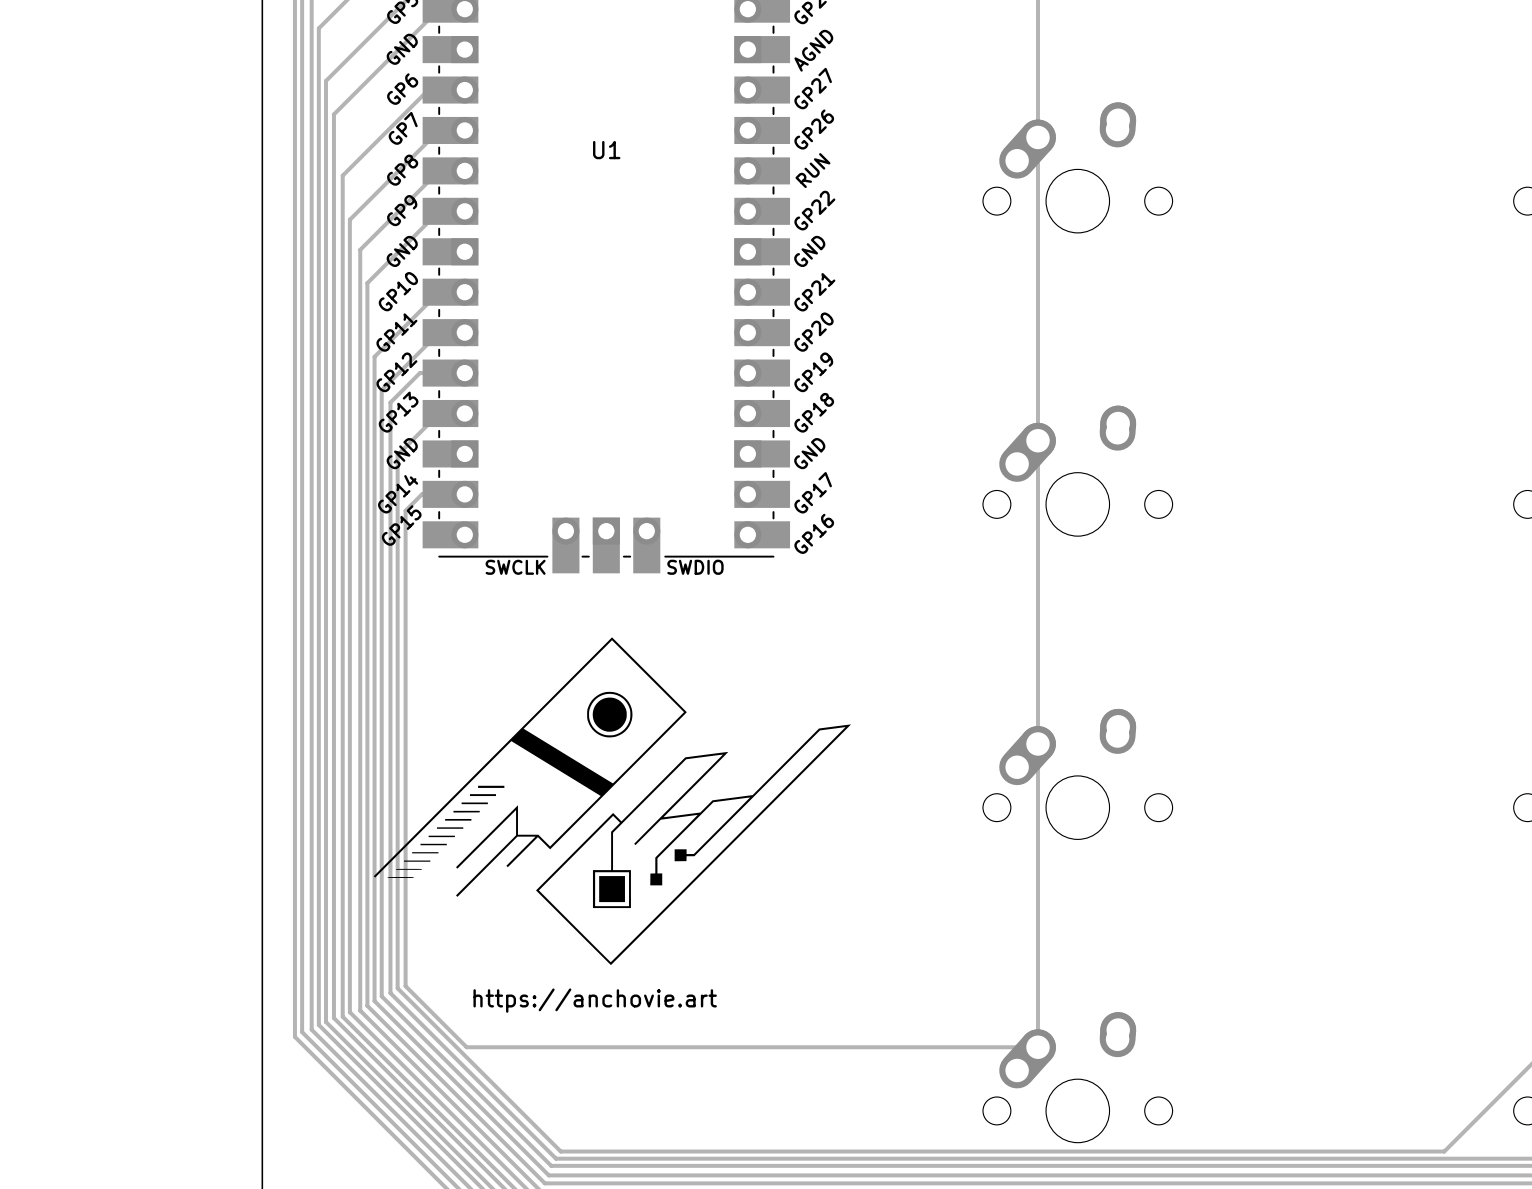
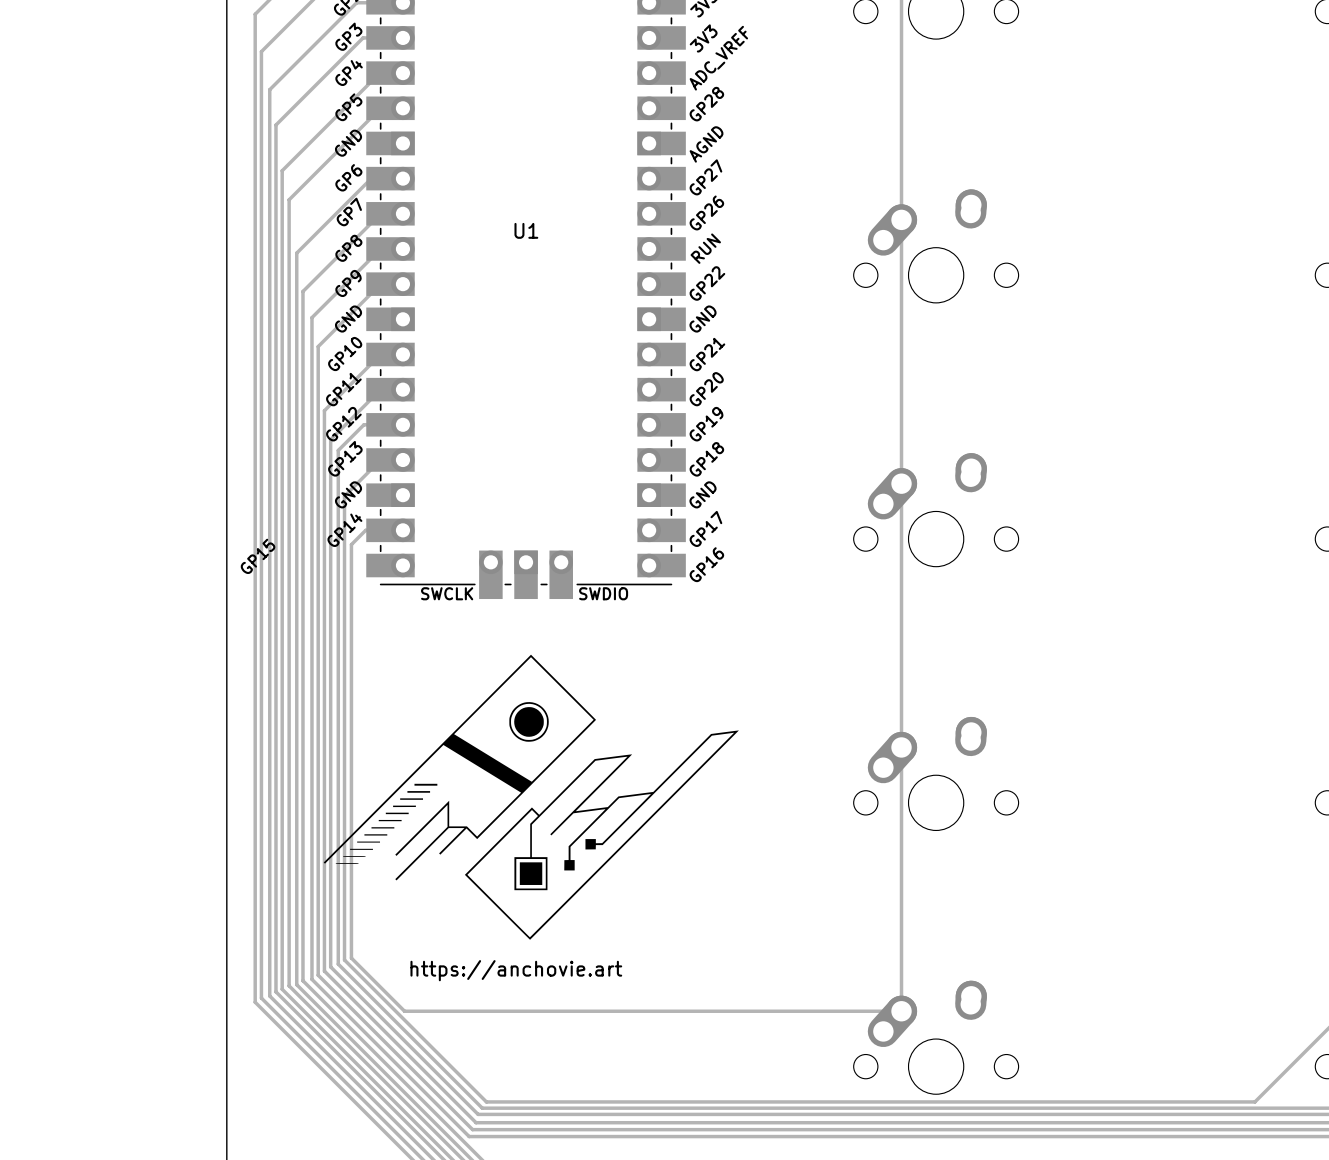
text position: GP15 (401, 525) -> GP15 (258, 556)

